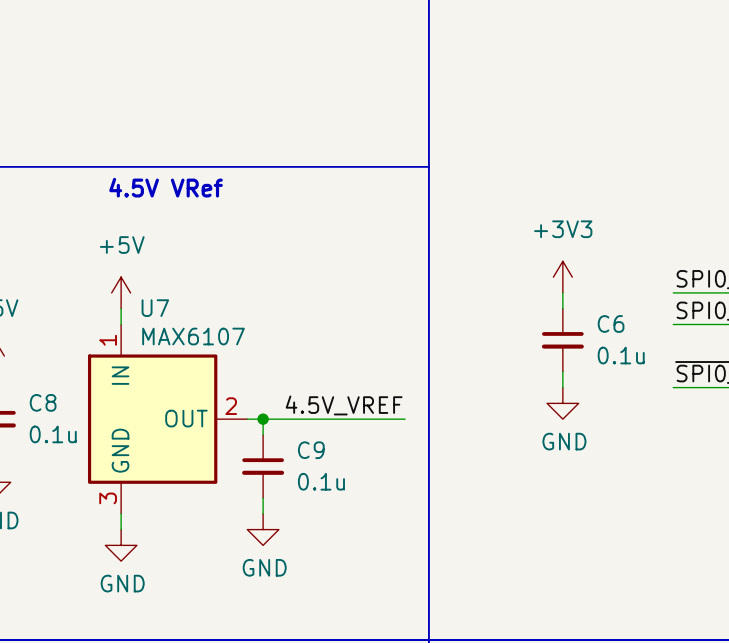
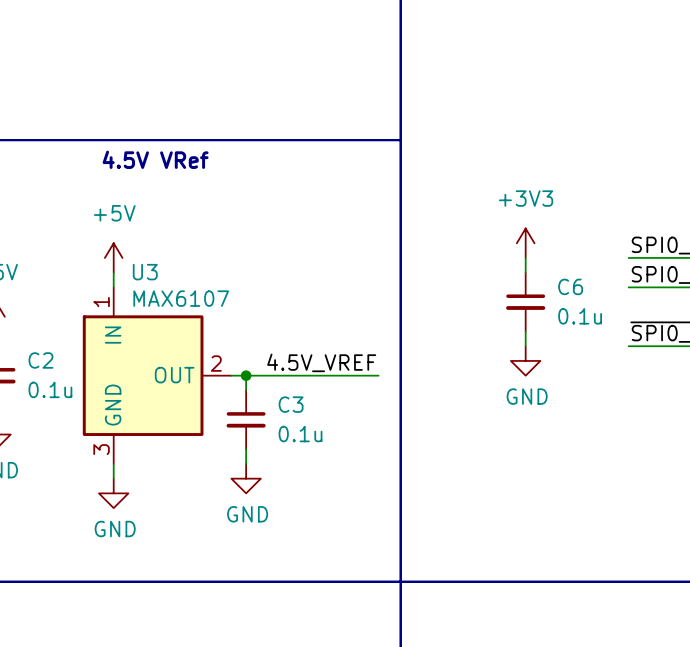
U7 name: U7 (155, 308) -> U3 (145, 272)
C8 name: C8 (43, 402) -> C2 (40, 360)
C9 name: C9 (311, 450) -> C3 (291, 404)

